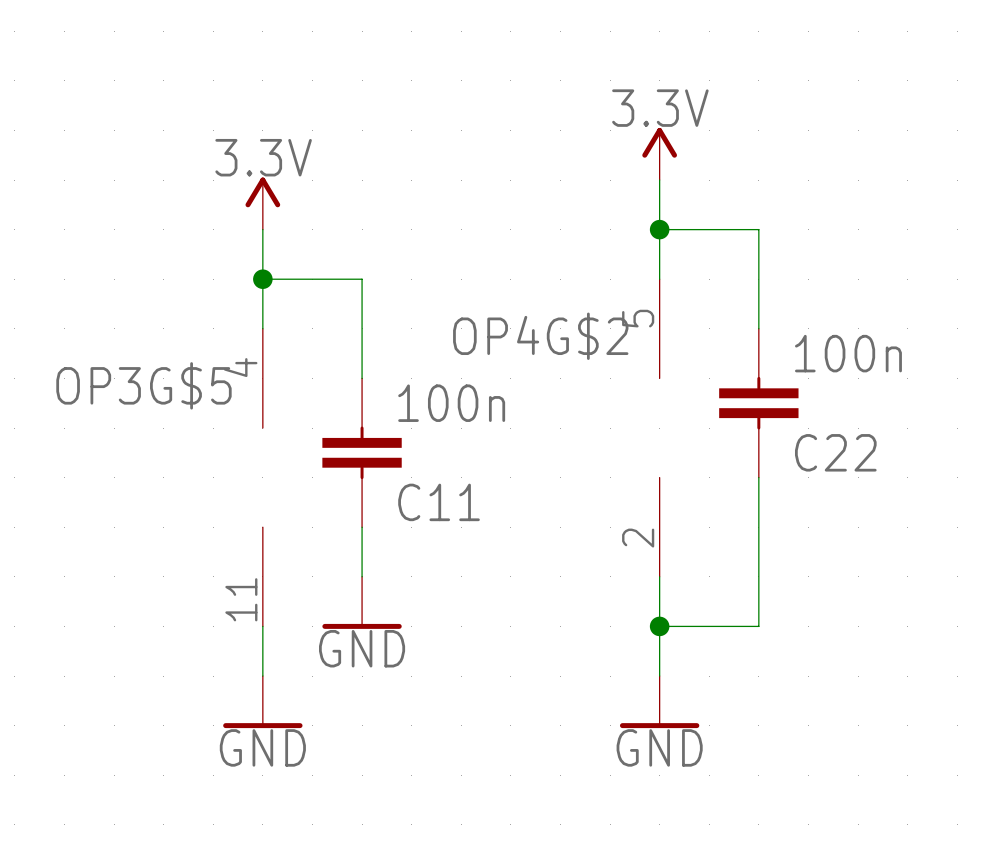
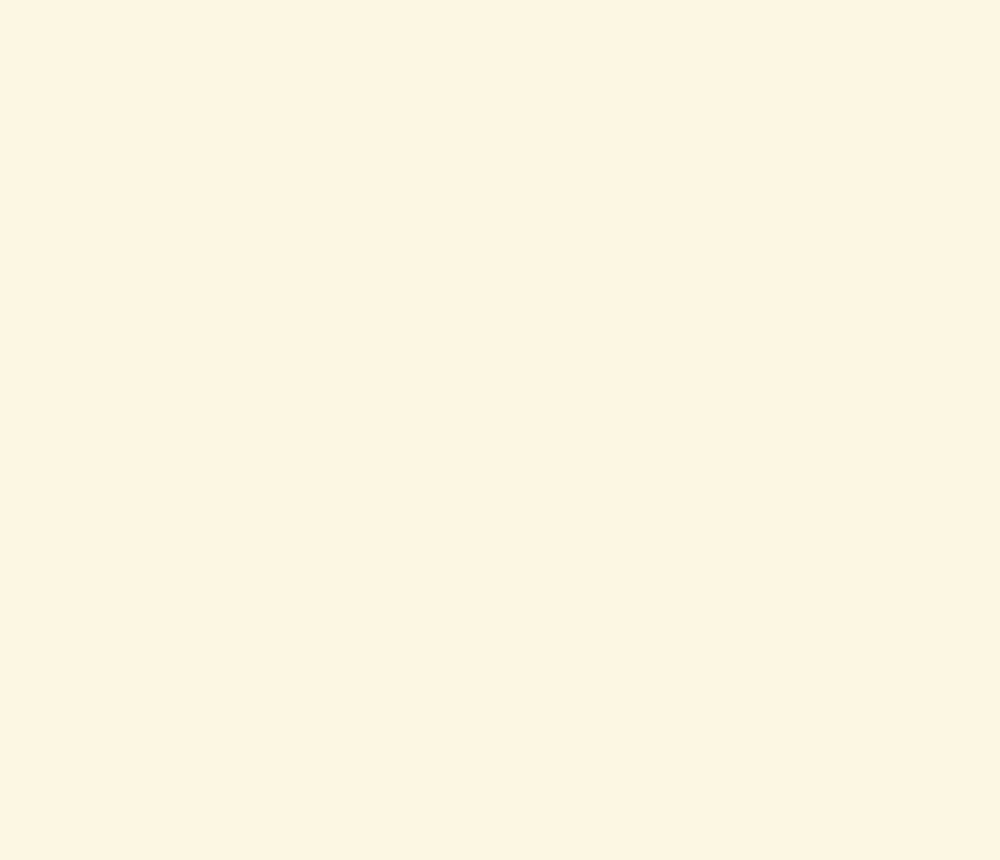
power symbol: 3.3V (659, 153) -> none
wire: (659, 180) (659, 279) -> none
power symbol: 3.3V (262, 203) -> none
wire: (262, 229) (262, 328) -> none
wire: (659, 229) (758, 229) (758, 328) -> none
junction: (659, 229) -> none
wire: (262, 279) (362, 279) (362, 378) -> none
junction: (262, 279) -> none
C22: 100n (758, 403) -> none
OP4G$2: (659, 428) -> none
C11: 100n (362, 452) -> none
OP3G$5: (262, 477) -> none
wire: (758, 477) (758, 626) (659, 626) -> none
wire: (362, 527) (362, 576) -> none
wire: (659, 576) (659, 676) -> none
power symbol: GND (362, 602) -> none
wire: (262, 626) (262, 676) -> none
junction: (659, 626) -> none
power symbol: GND (262, 702) -> none
power symbol: GND (659, 702) -> none

